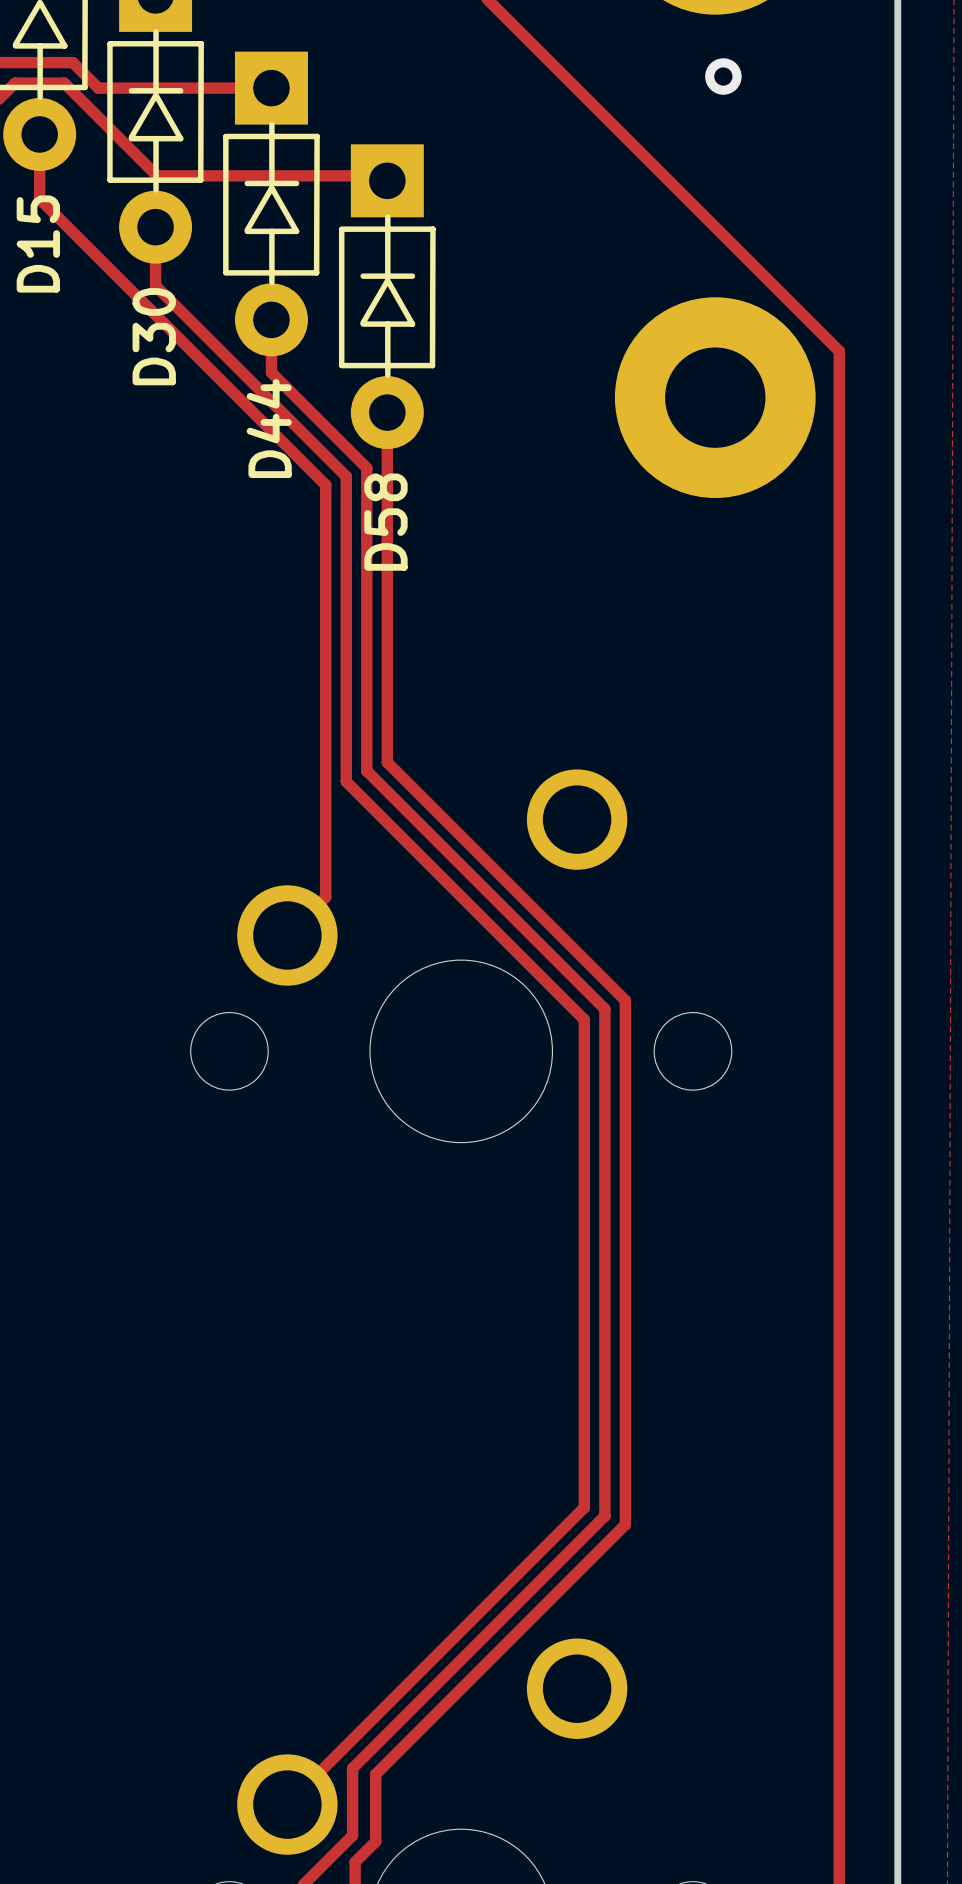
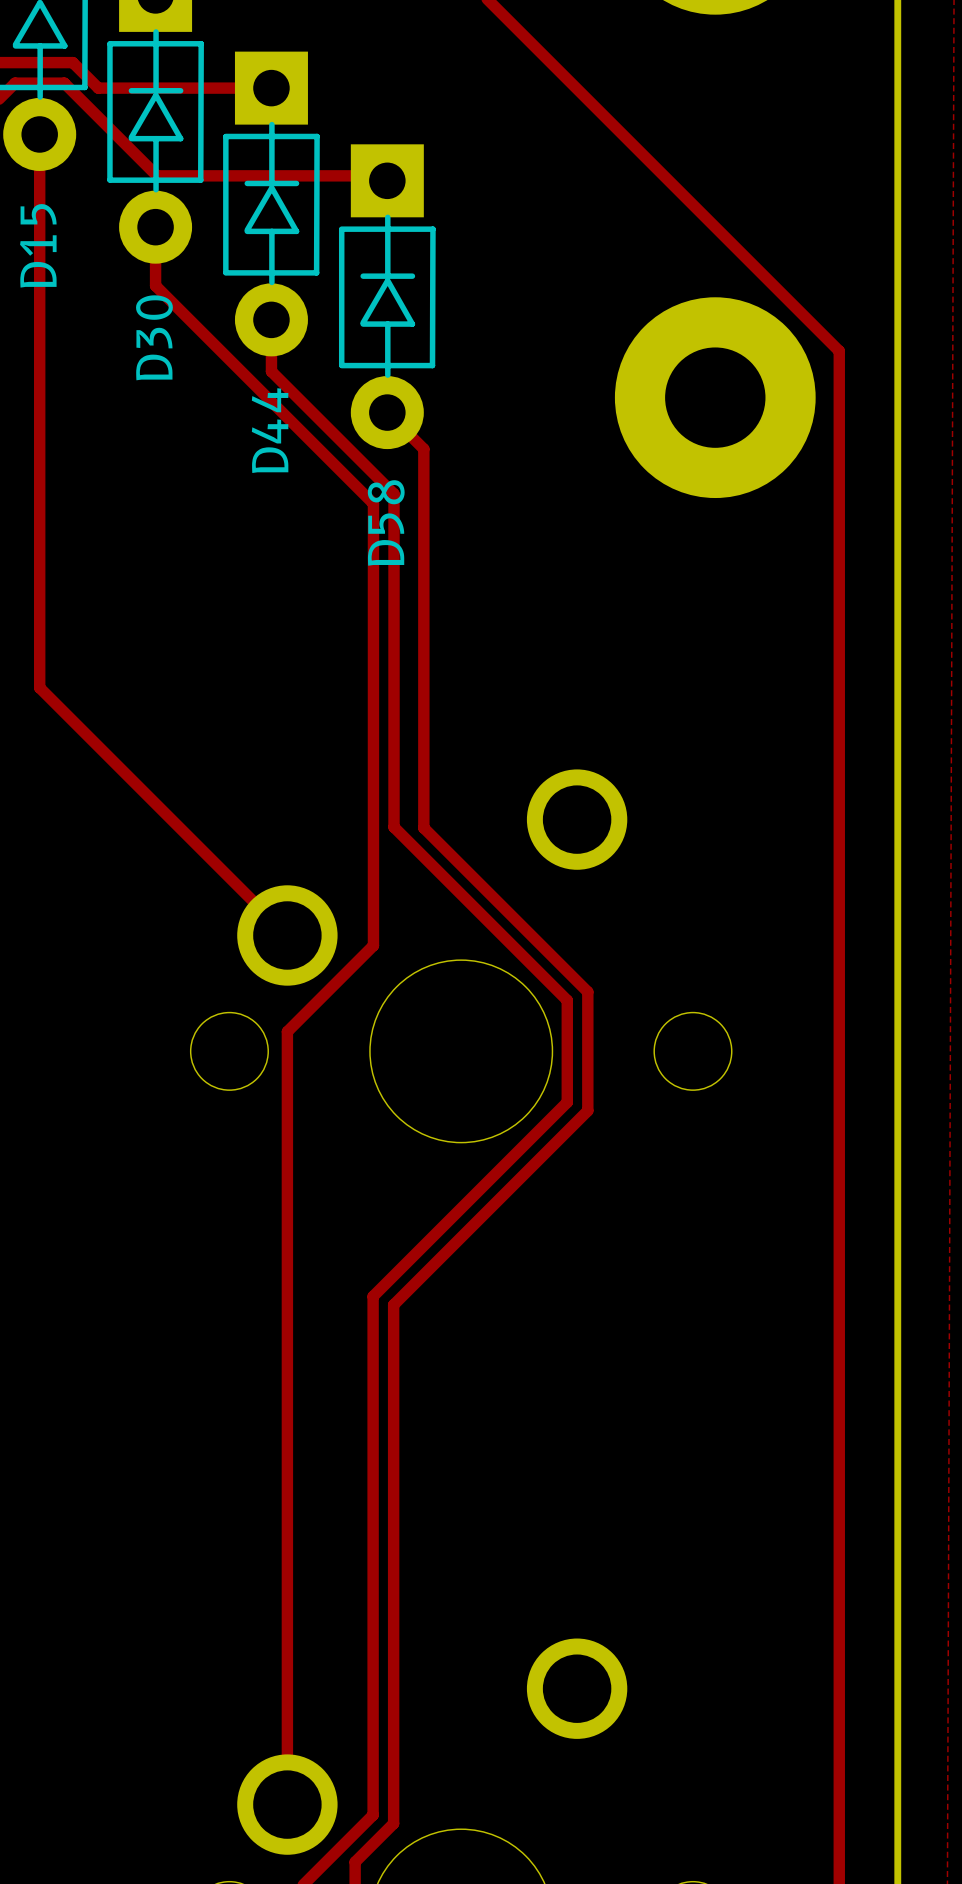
via: (723, 76) -> none
track: (39, 198) (325, 485) (325, 897) (287, 935) -> (39, 198) (39, 687) (287, 935)
track: (271, 371) (366, 468) (366, 770) (423, 827) -> (387, 412) (423, 449) (423, 827)
track: none -> (271, 371) (394, 494) (394, 827) (567, 1000) (567, 1102) (373, 1296) (373, 1815) (352, 1835)
track: (387, 412) (387, 762) (625, 1000) (625, 1524) (375, 1774) (375, 1841) -> none
track: (346, 476) (346, 781) (584, 1019) (584, 1507) (287, 1804) -> (346, 476) (373, 503) (373, 945) (287, 1031) (287, 1804)
track: (587, 991) (604, 1009) (604, 1516) (352, 1768) (352, 1835) -> (587, 991) (587, 1110) (393, 1304) (393, 1823) (375, 1841)

